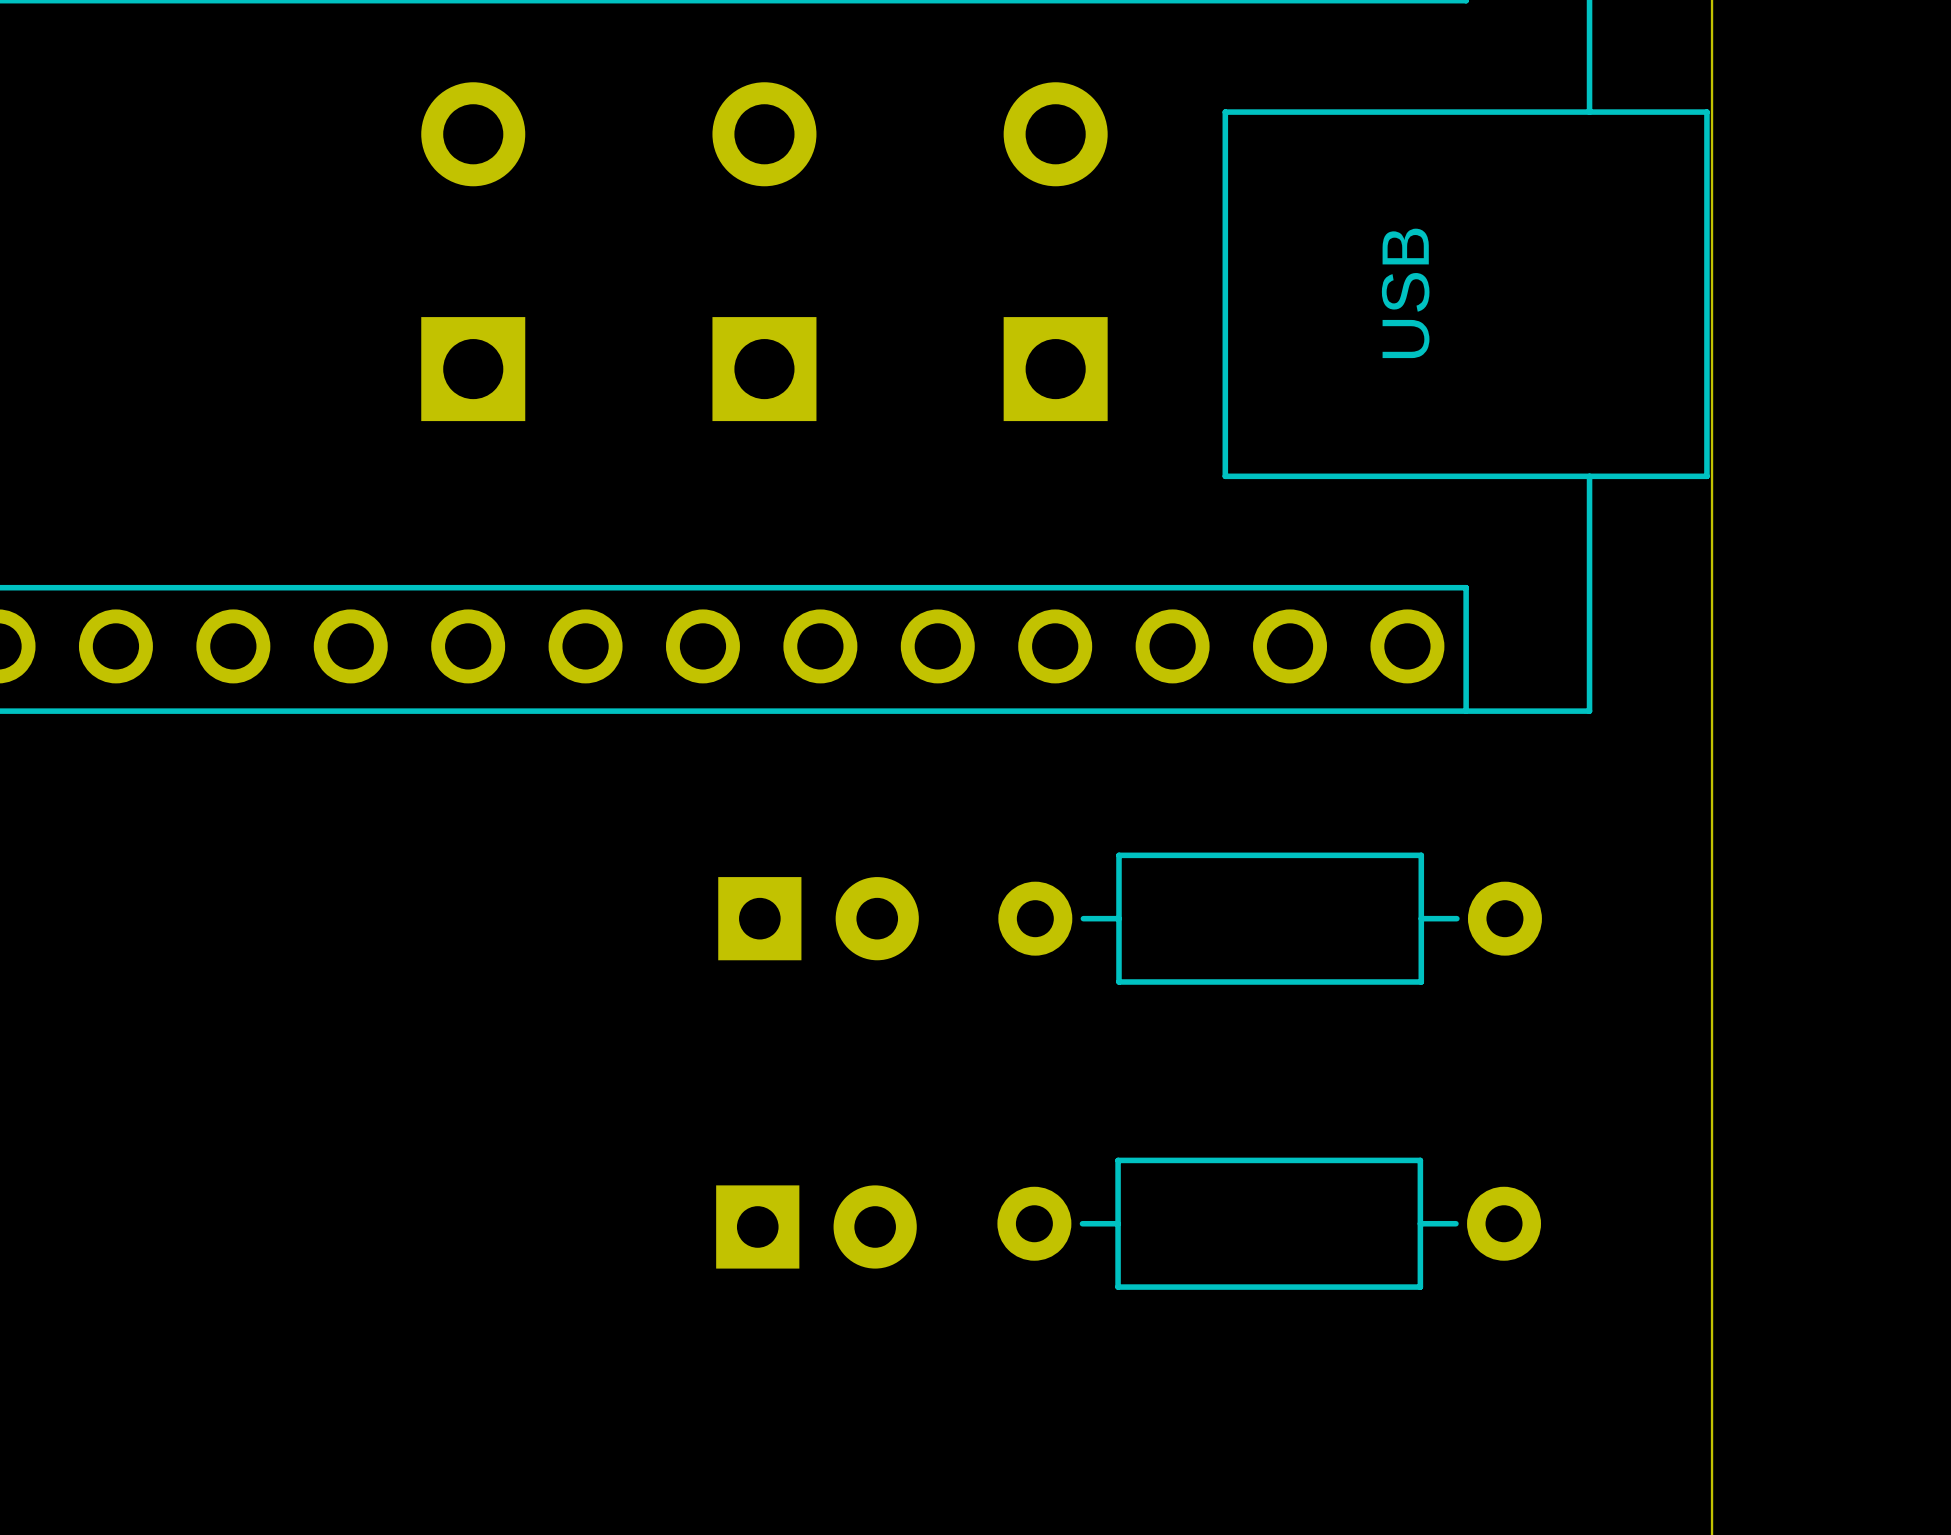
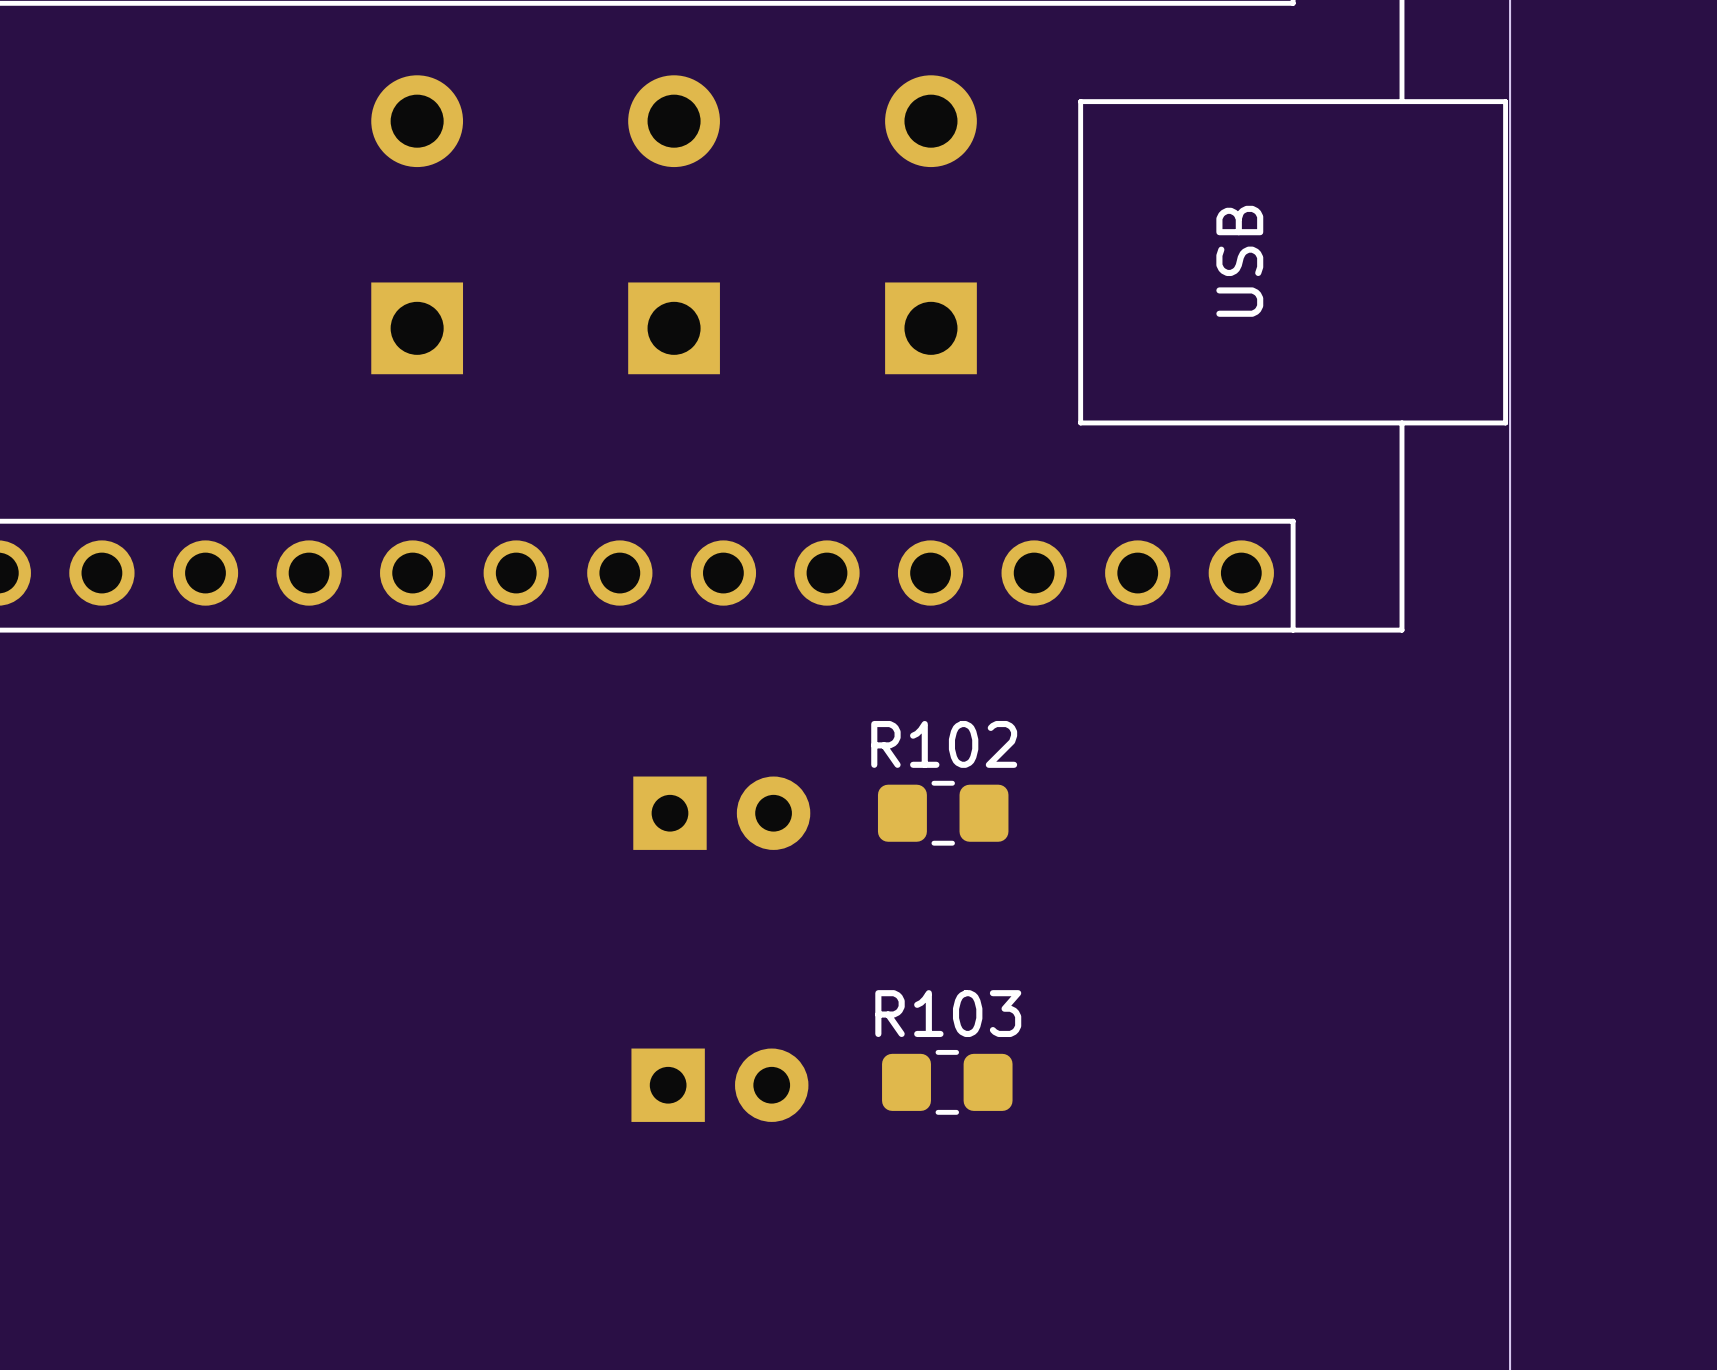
R102: none -> (943, 813)
part: (1270, 918) -> none
R103: none -> (947, 1082)
part: (1269, 1223) -> none

